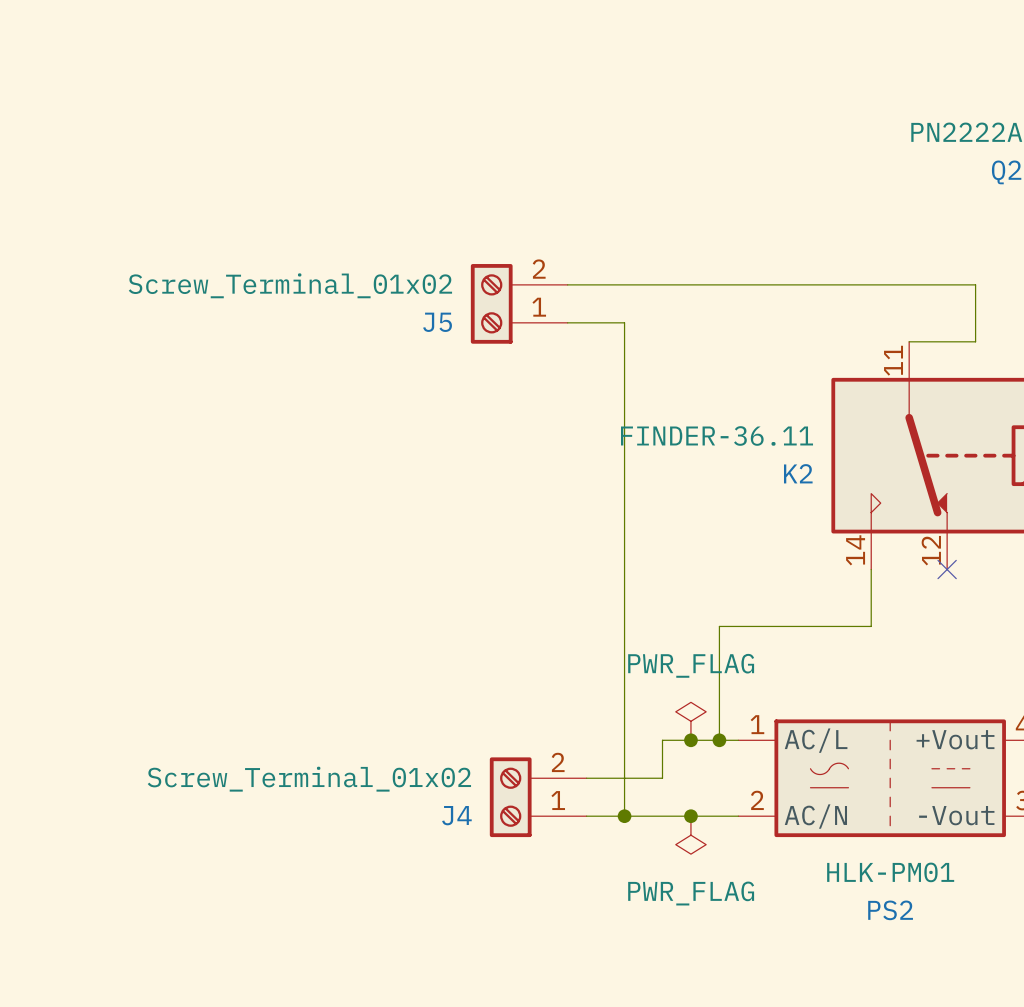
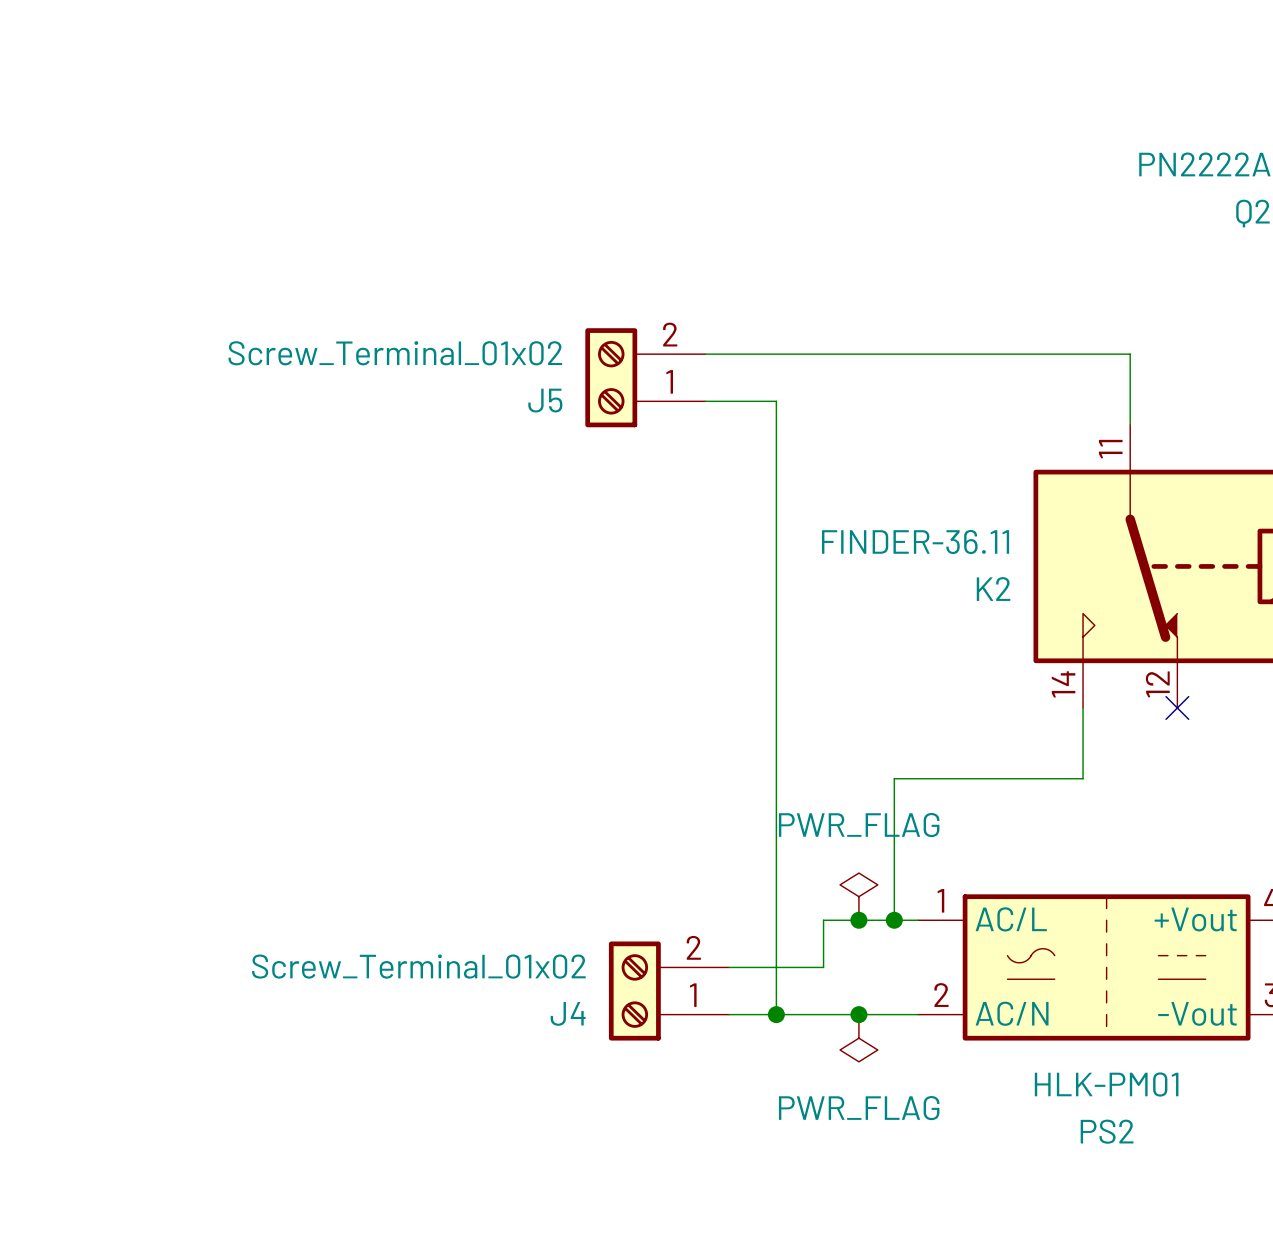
wire: (909, 284) (975, 284) (975, 341) (909, 341) -> (1130, 354) (1130, 424)

